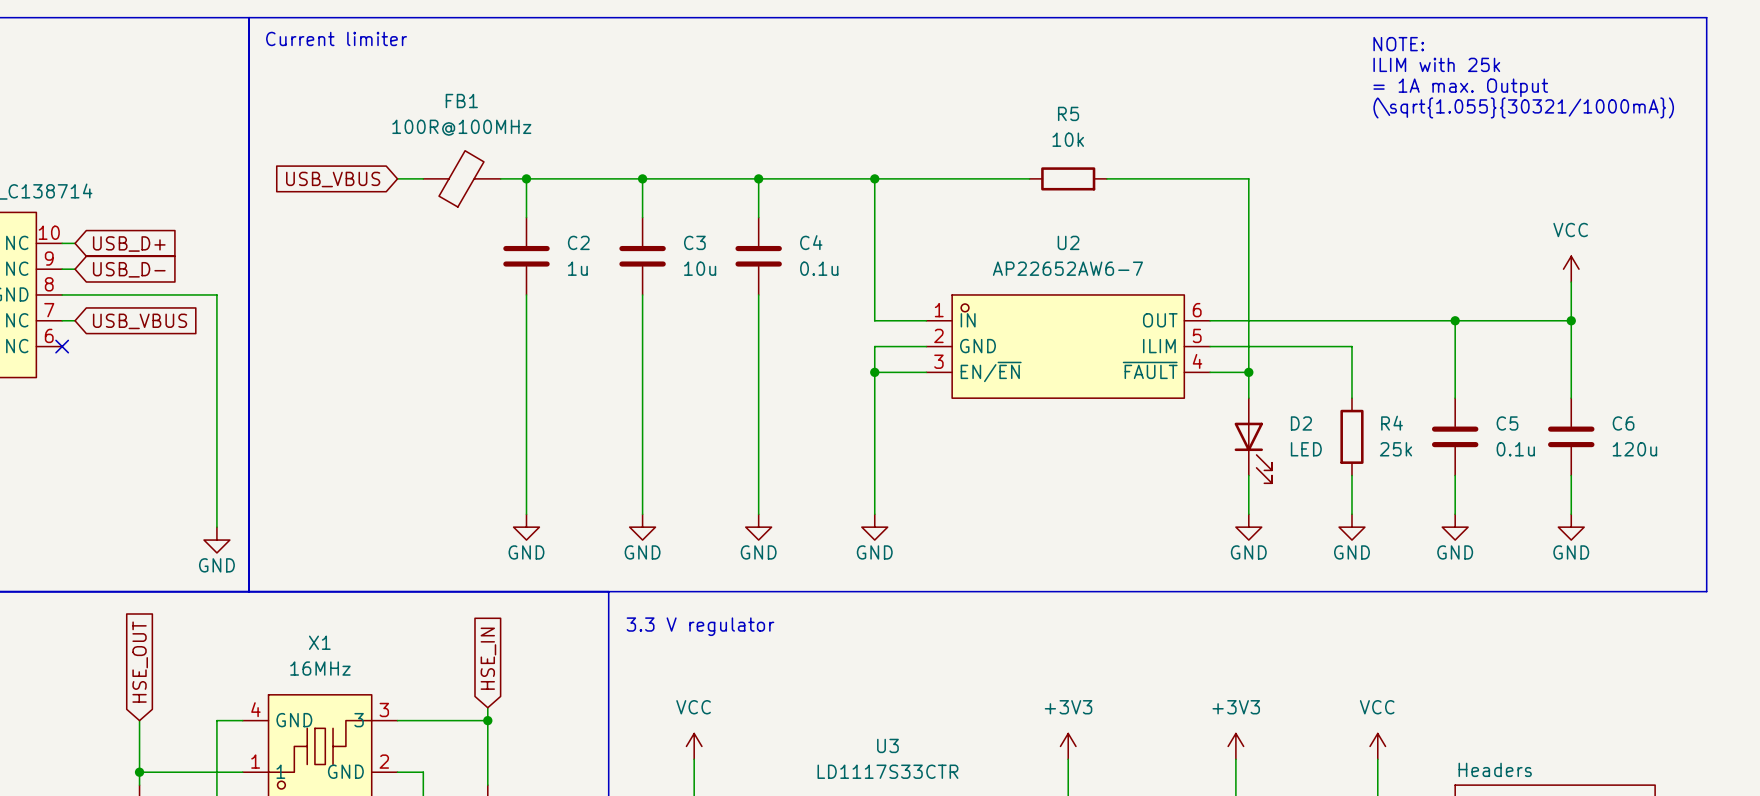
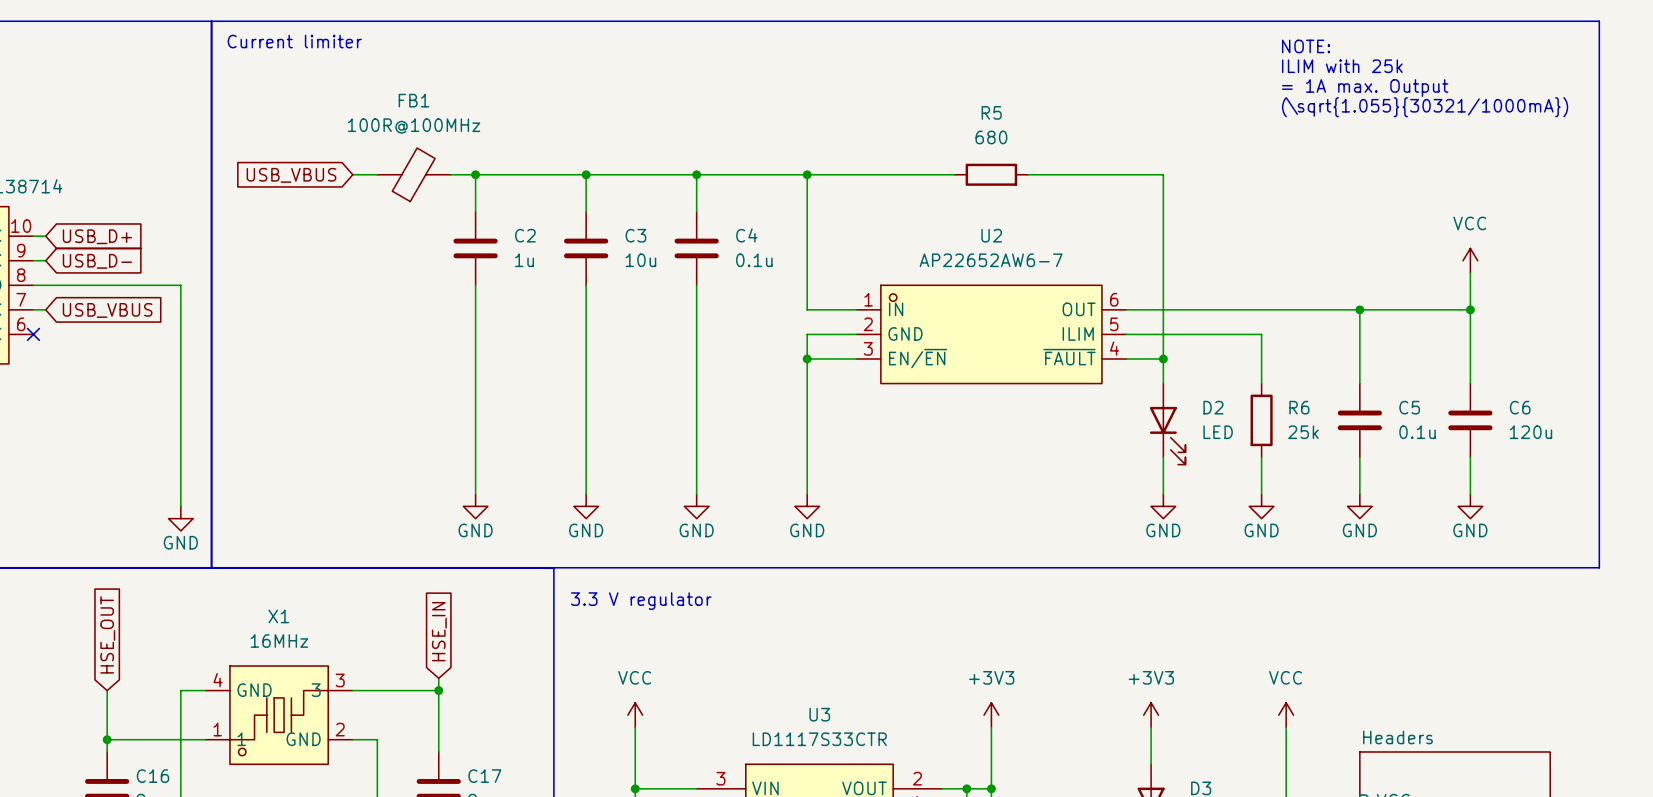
R5 value: 10k (1068, 139) -> 680 (991, 137)
R4 name: R4 (1392, 423) -> R6 (1299, 407)

